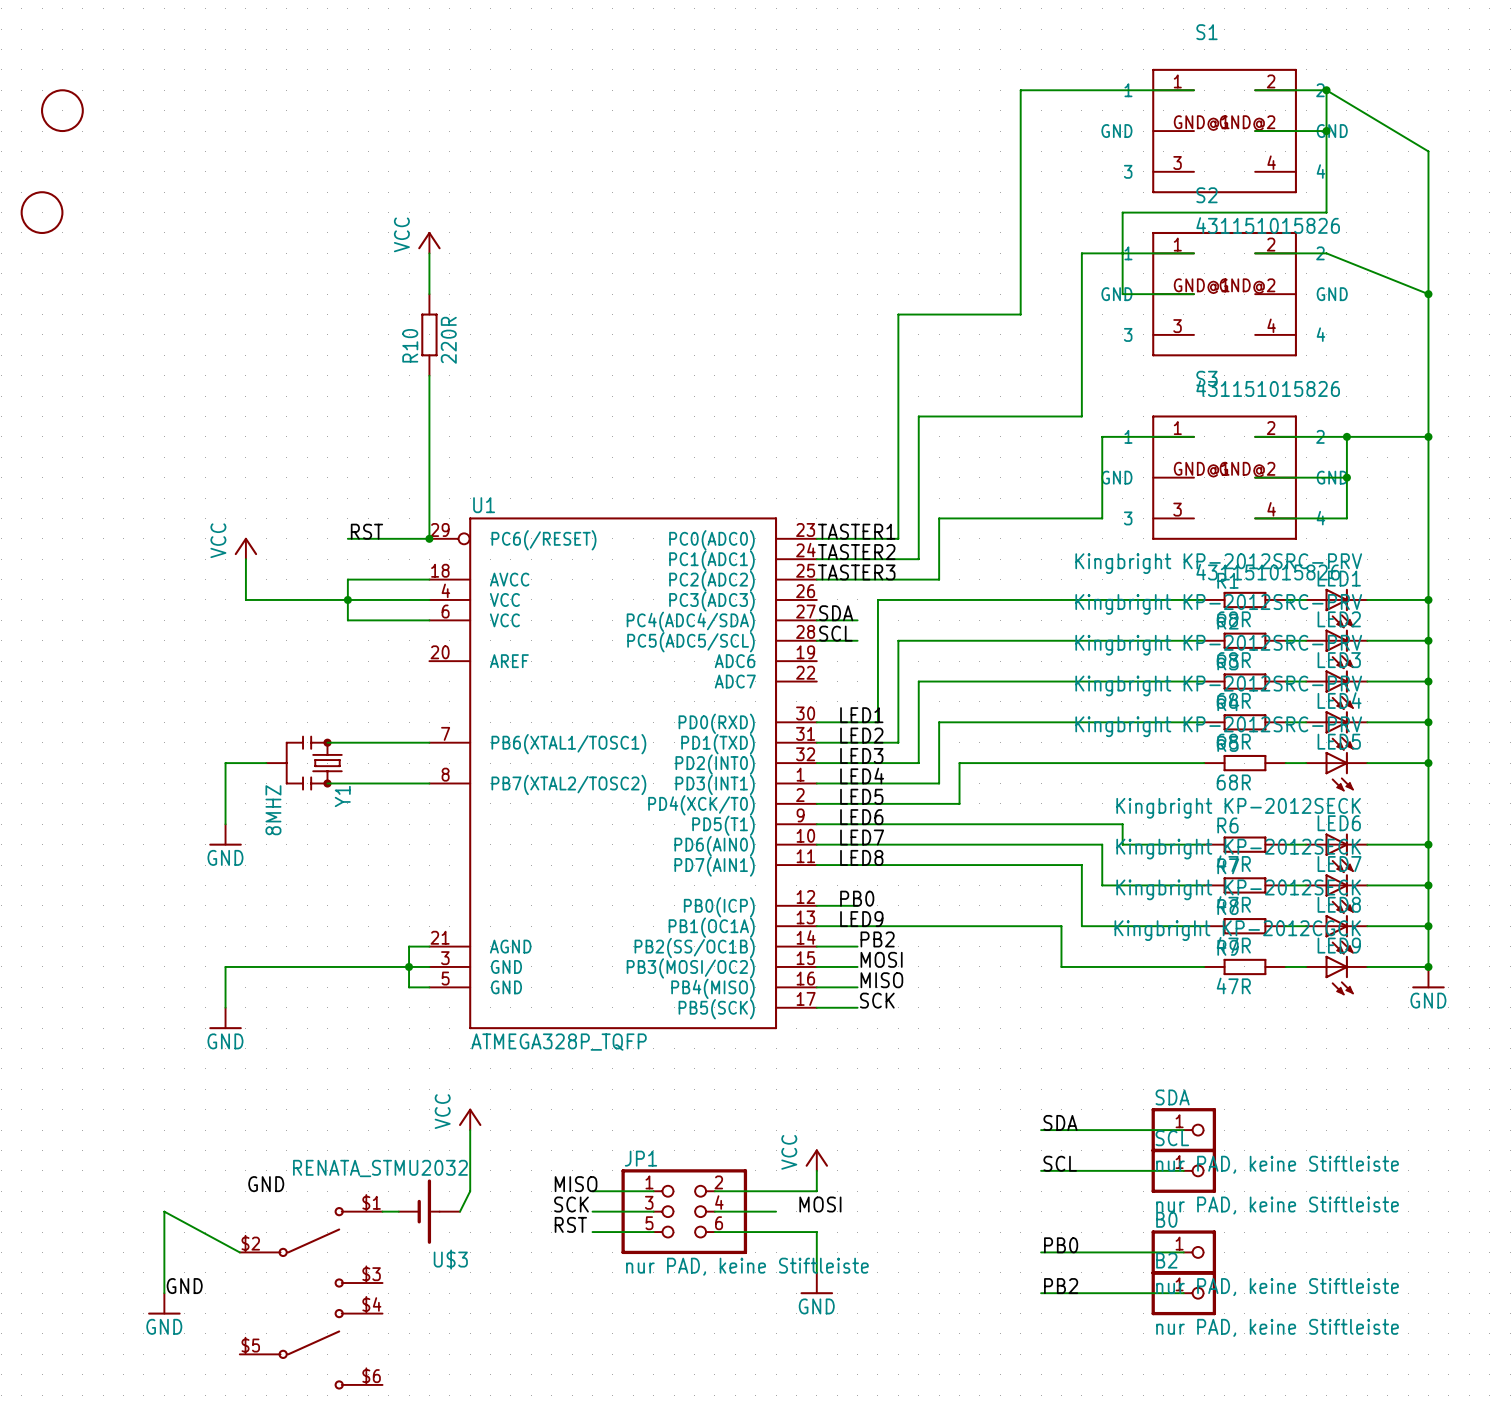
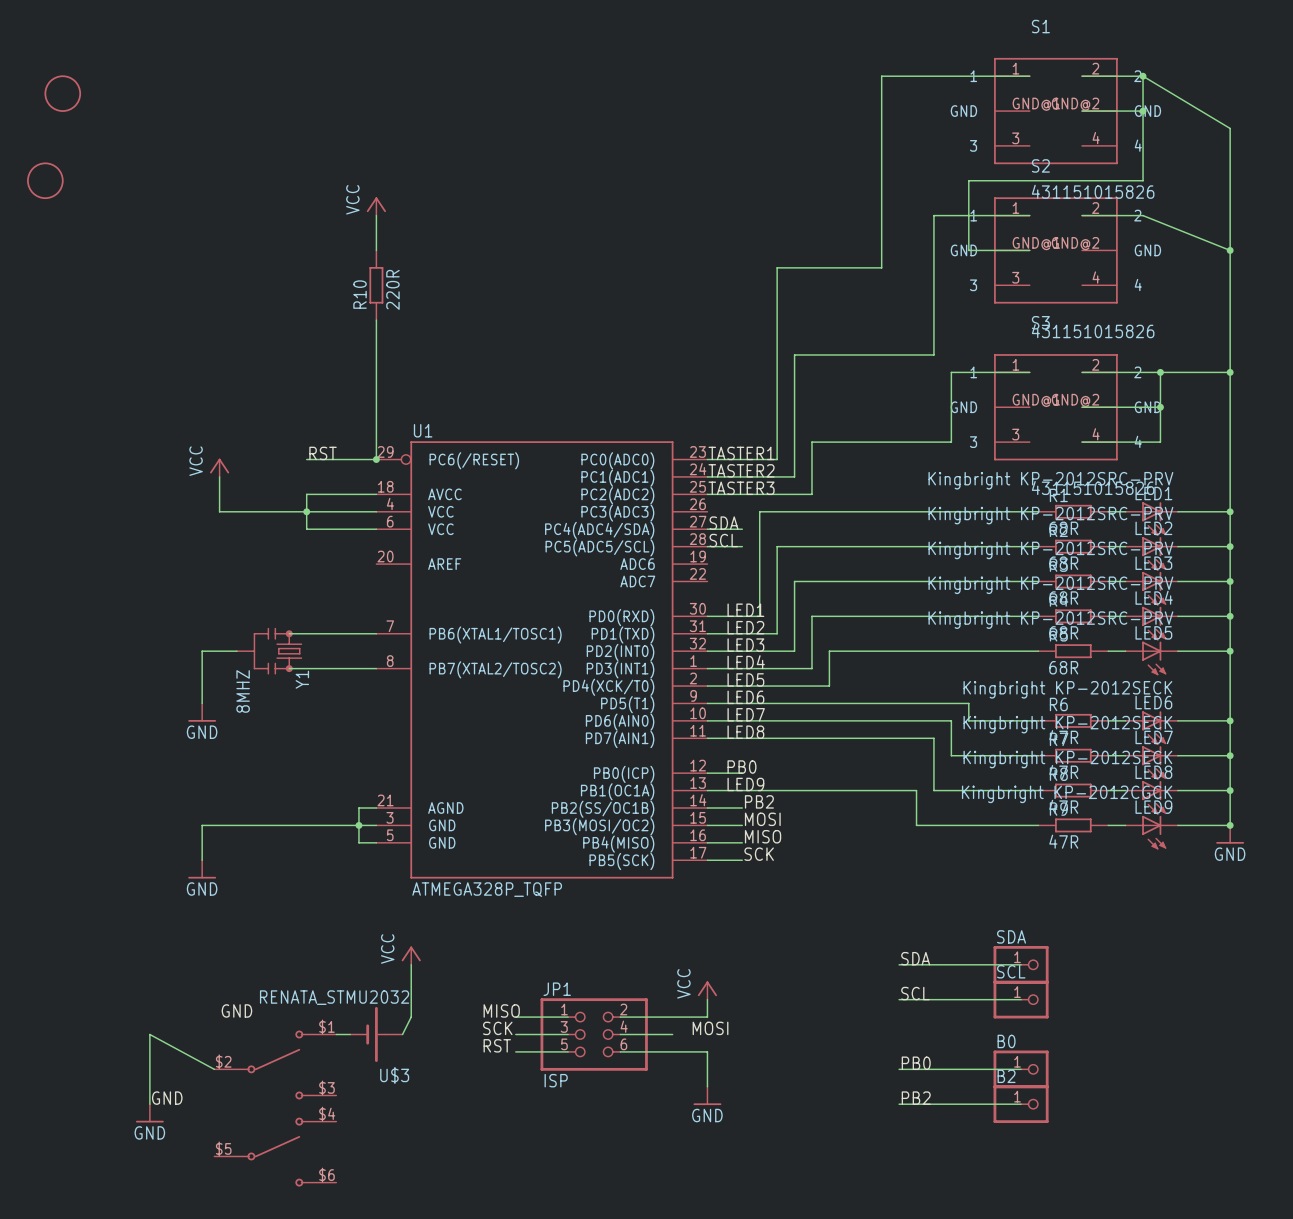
SDA value: nur PAD, keine Stiftleiste (1277, 1164) -> none
SCL value: nur PAD, keine Stiftleiste (1277, 1205) -> none
JP1 value: nur PAD, keine Stiftleiste (747, 1266) -> ISP (556, 1080)
B0 value: nur PAD, keine Stiftleiste (1277, 1287) -> none
B2 value: nur PAD, keine Stiftleiste (1277, 1327) -> none

